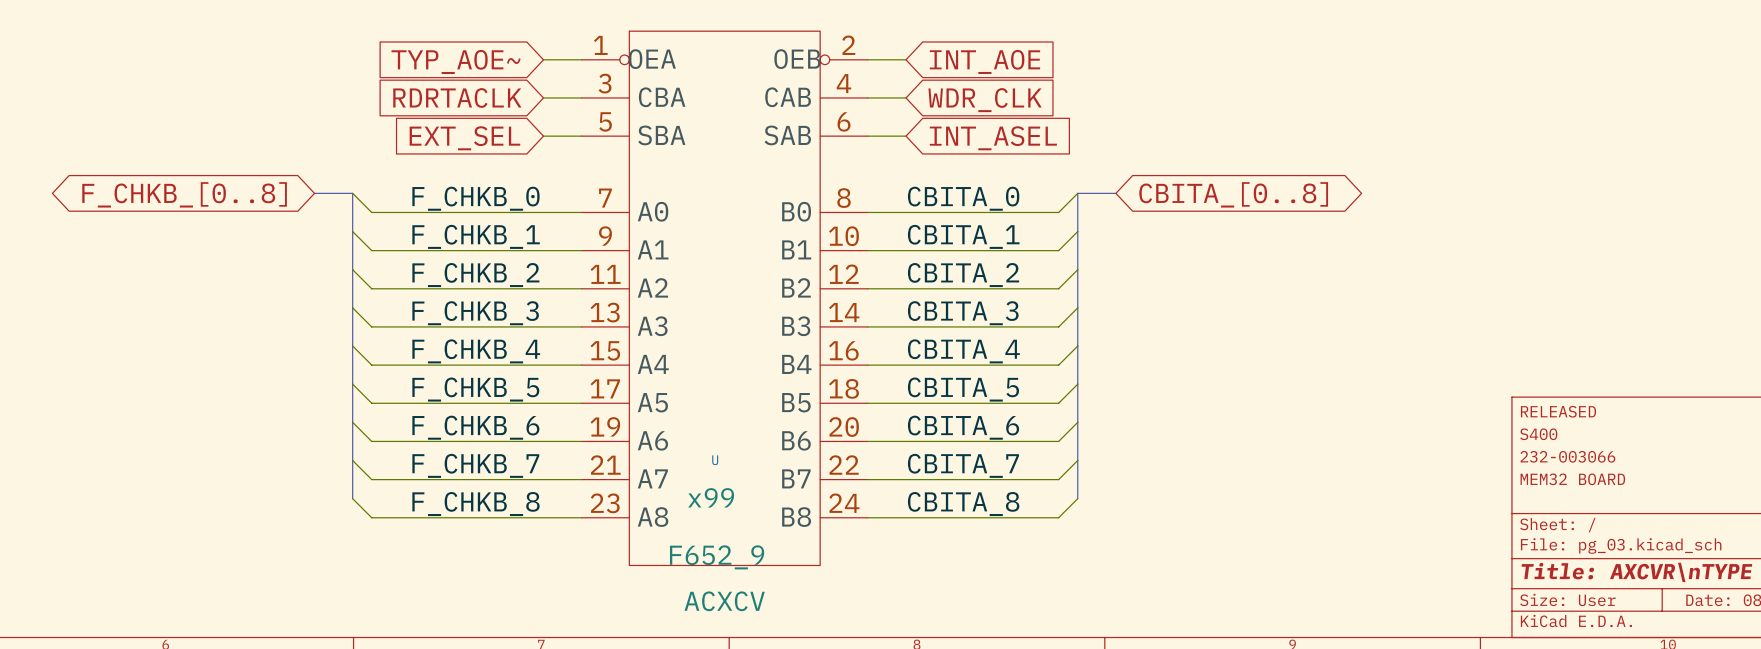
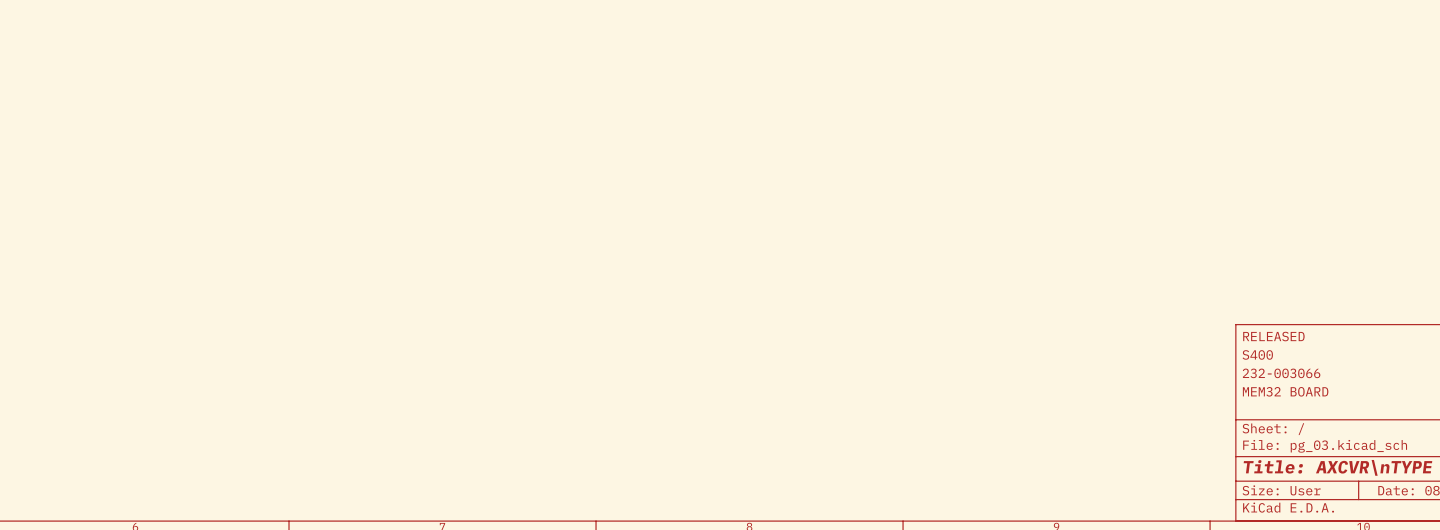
wire: (543, 59) (581, 59) -> none
wire: (867, 59) (906, 59) -> none
global label: TYP_AOE~ (456, 61) -> none
global label: INT_AOE (984, 61) -> none
global label: RDRTACLK (457, 97) -> none
wire: (543, 97) (581, 97) -> none
wire: (867, 97) (906, 97) -> none
global label: WDR_CLK (985, 100) -> none
wire: (543, 136) (581, 136) -> none
wire: (867, 136) (906, 136) -> none
global label: EXT_SEL (464, 138) -> none
global label: INT_ASEL (993, 138) -> none
bus: (314, 193) (352, 193) (352, 498) -> none
wire: (352, 193) (371, 212) (581, 212) -> none
wire: (1077, 193) (1058, 212) (867, 212) -> none
bus: (1115, 193) (1077, 193) (1077, 498) -> none
global label: F_CHKB_[0..8] (184, 194) -> none
global label: CBITA_[0..8] (1233, 194) -> none
label: F_CHKB_0 (475, 198) -> none
label: CBITA_0 (963, 198) -> none
wire: (352, 231) (371, 250) (581, 250) -> none
wire: (1077, 231) (1058, 250) (867, 250) -> none
label: F_CHKB_1 (476, 236) -> none
label: CBITA_1 (963, 236) -> none
wire: (352, 269) (371, 288) (581, 288) -> none
wire: (1077, 269) (1058, 288) (867, 288) -> none
label: F_CHKB_2 (475, 275) -> none
label: CBITA_2 (963, 275) -> none
U: F652_9 (724, 298) -> none
wire: (352, 307) (371, 326) (581, 326) -> none
wire: (1077, 307) (1058, 326) (867, 326) -> none
label: F_CHKB_3 (475, 313) -> none
label: CBITA_3 (963, 313) -> none
wire: (352, 346) (371, 365) (581, 365) -> none
wire: (1077, 346) (1058, 365) (867, 365) -> none
label: F_CHKB_4 (476, 351) -> none
label: CBITA_4 (963, 351) -> none
wire: (352, 384) (371, 403) (581, 403) -> none
wire: (1077, 384) (1058, 403) (867, 403) -> none
label: F_CHKB_5 (475, 389) -> none
label: CBITA_5 (963, 389) -> none
wire: (352, 422) (371, 441) (581, 441) -> none
wire: (1077, 422) (1058, 441) (867, 441) -> none
label: F_CHKB_6 (475, 427) -> none
label: CBITA_6 (963, 427) -> none
wire: (352, 460) (371, 479) (581, 479) -> none
wire: (1077, 460) (1058, 479) (867, 479) -> none
label: F_CHKB_7 (475, 465) -> none
label: CBITA_7 (963, 465) -> none
wire: (352, 498) (371, 517) (581, 517) -> none
wire: (1077, 498) (1058, 517) (867, 517) -> none
label: F_CHKB_8 (476, 504) -> none
label: CBITA_8 (963, 504) -> none

